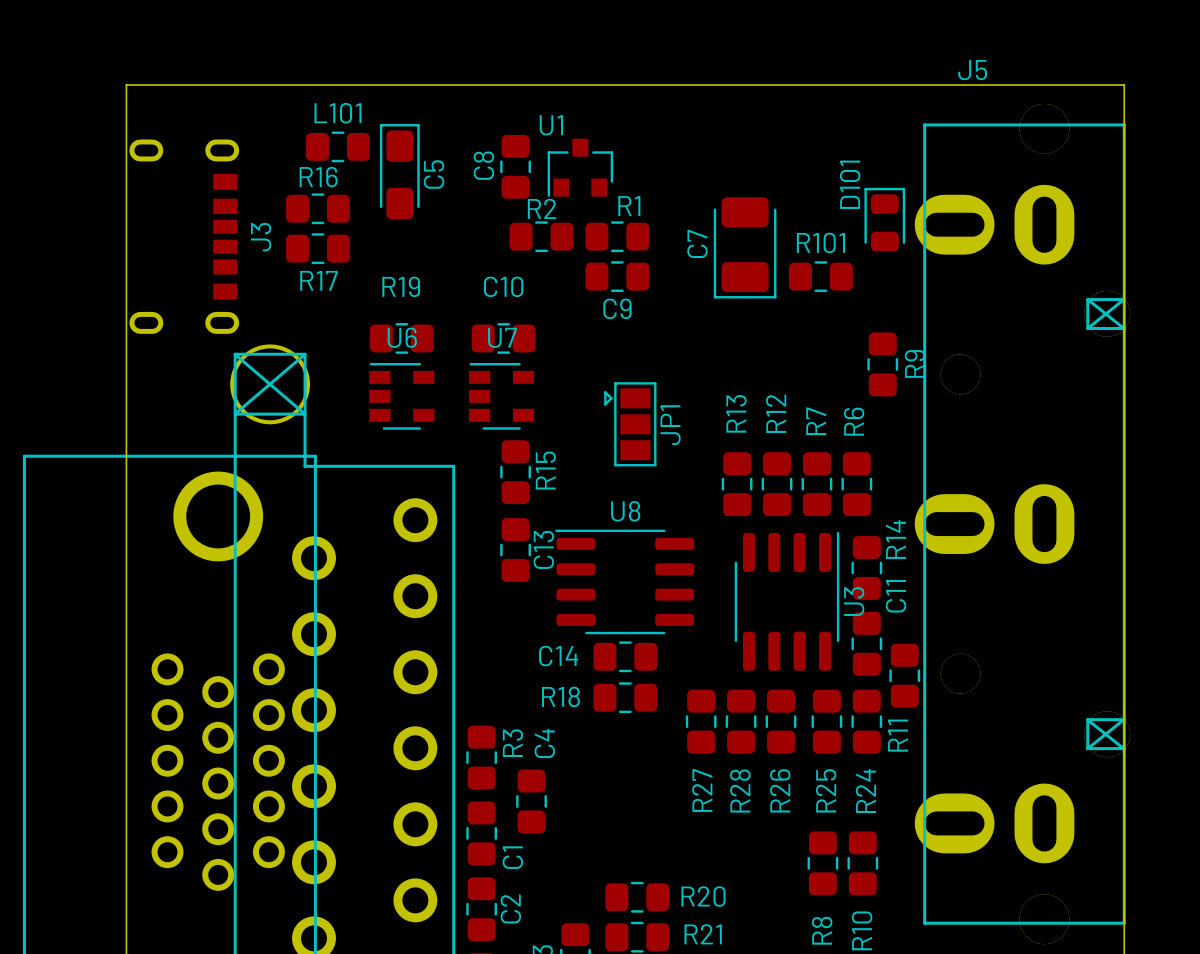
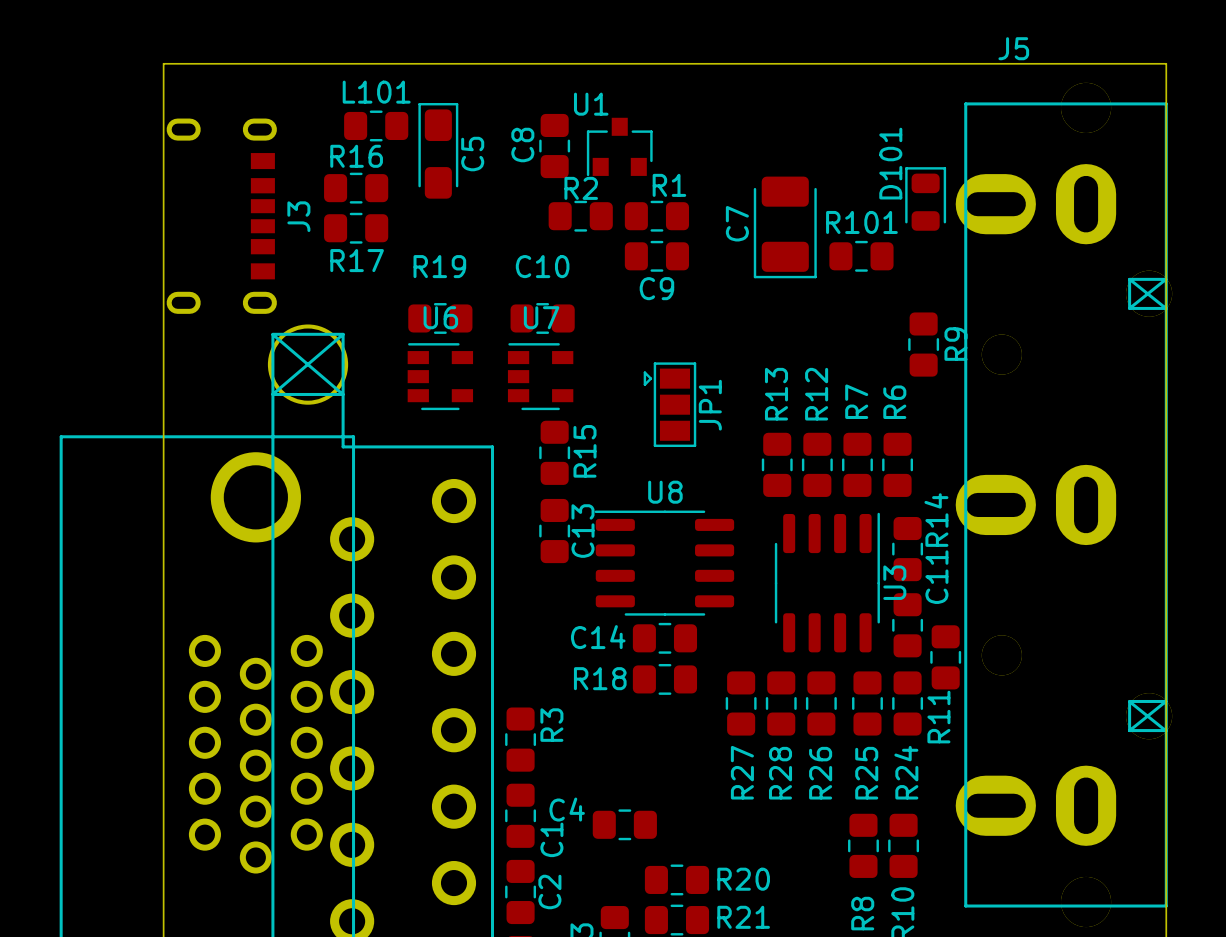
C4 name position: C4 (544, 743) -> C4 (567, 809)
C4 rotation: 0° (531, 801) -> 90° clockwise (624, 824)
C4 position: (531, 801) -> (624, 824)

